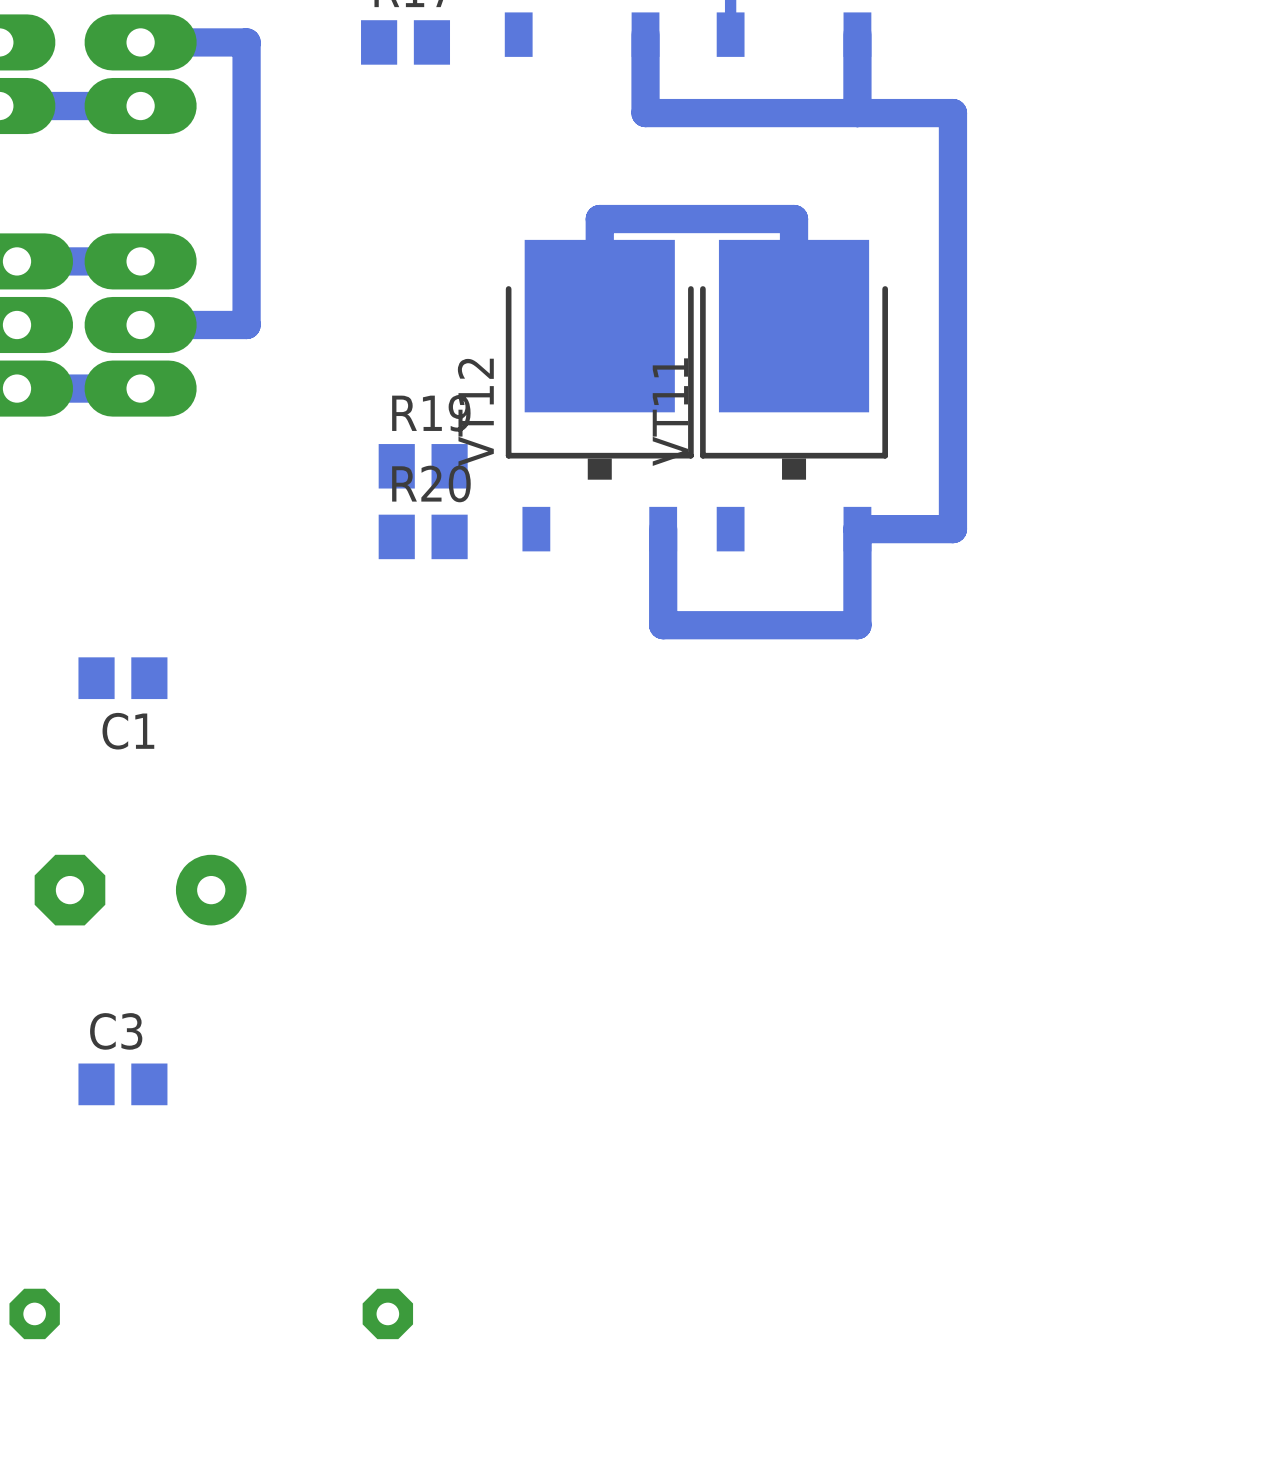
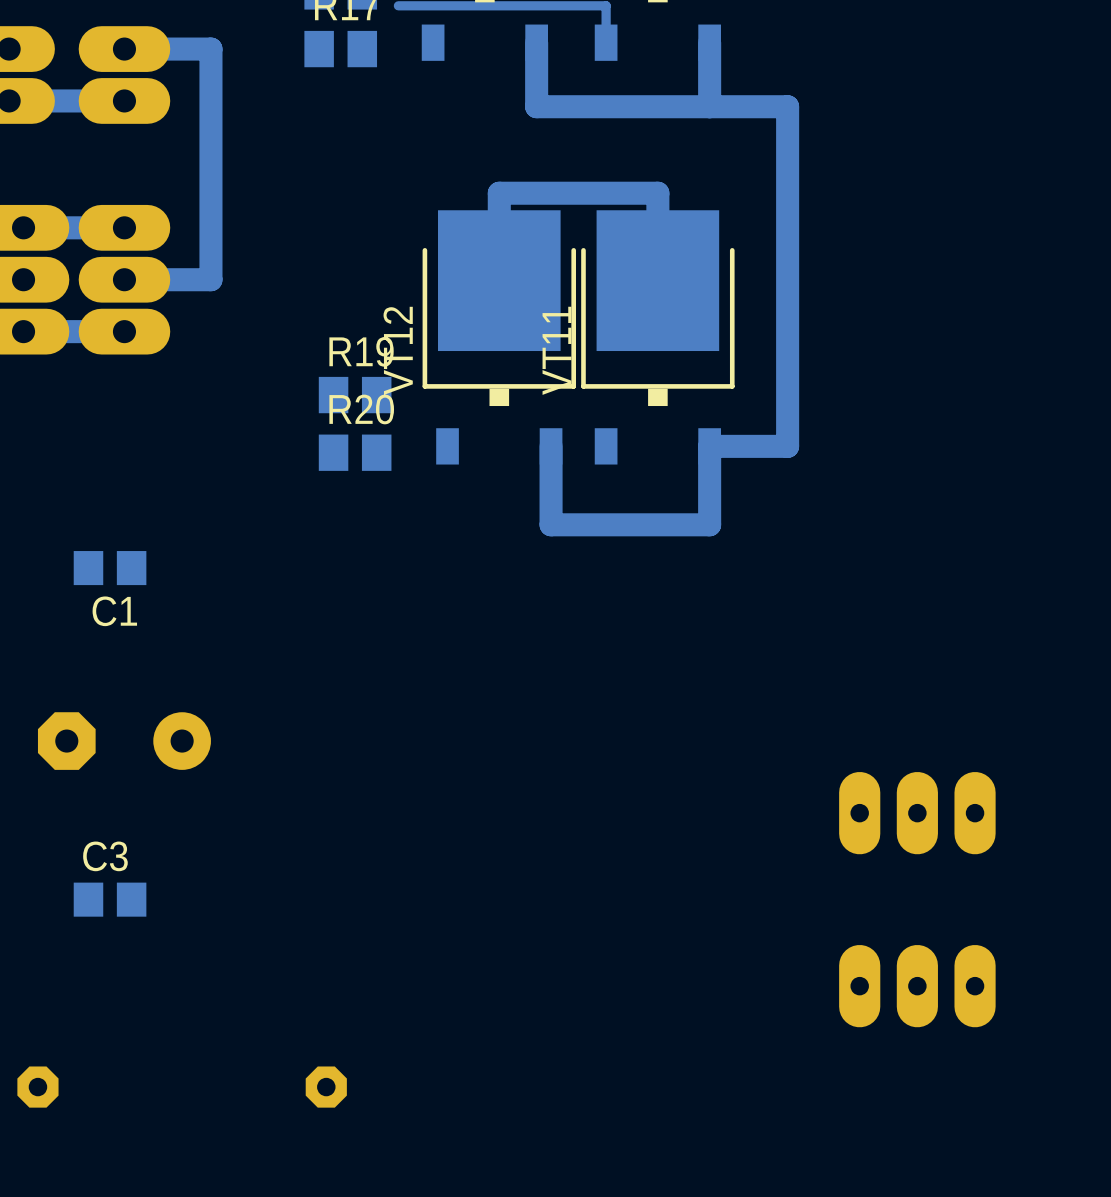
part: none -> (917, 813)
part: none -> (917, 986)

